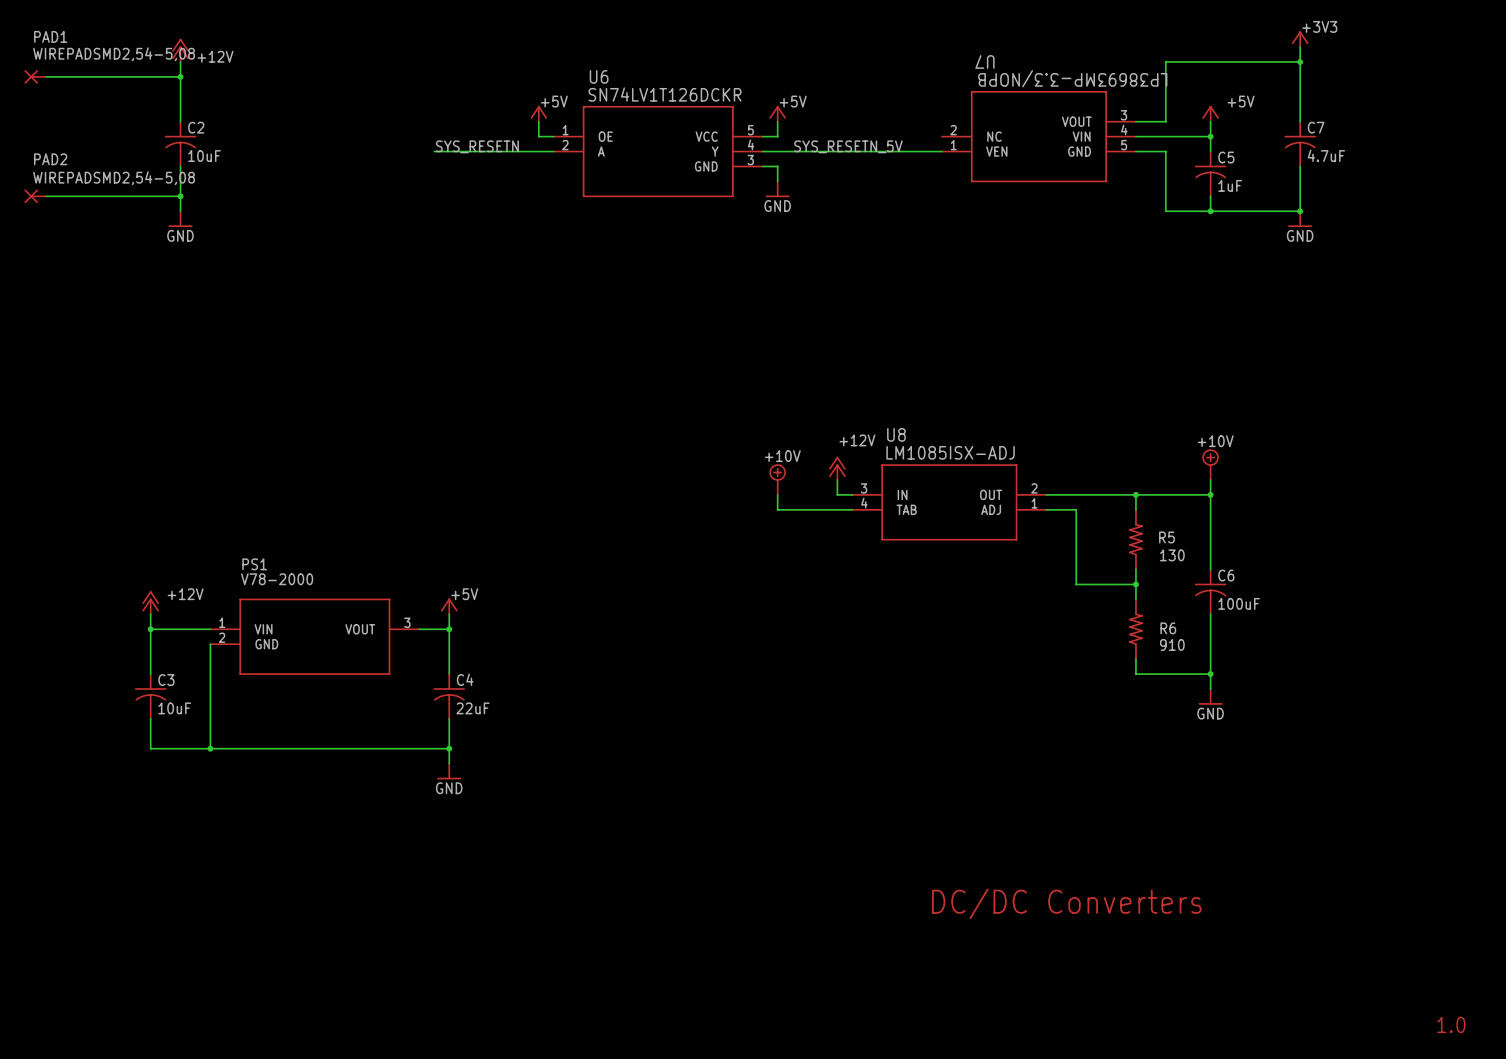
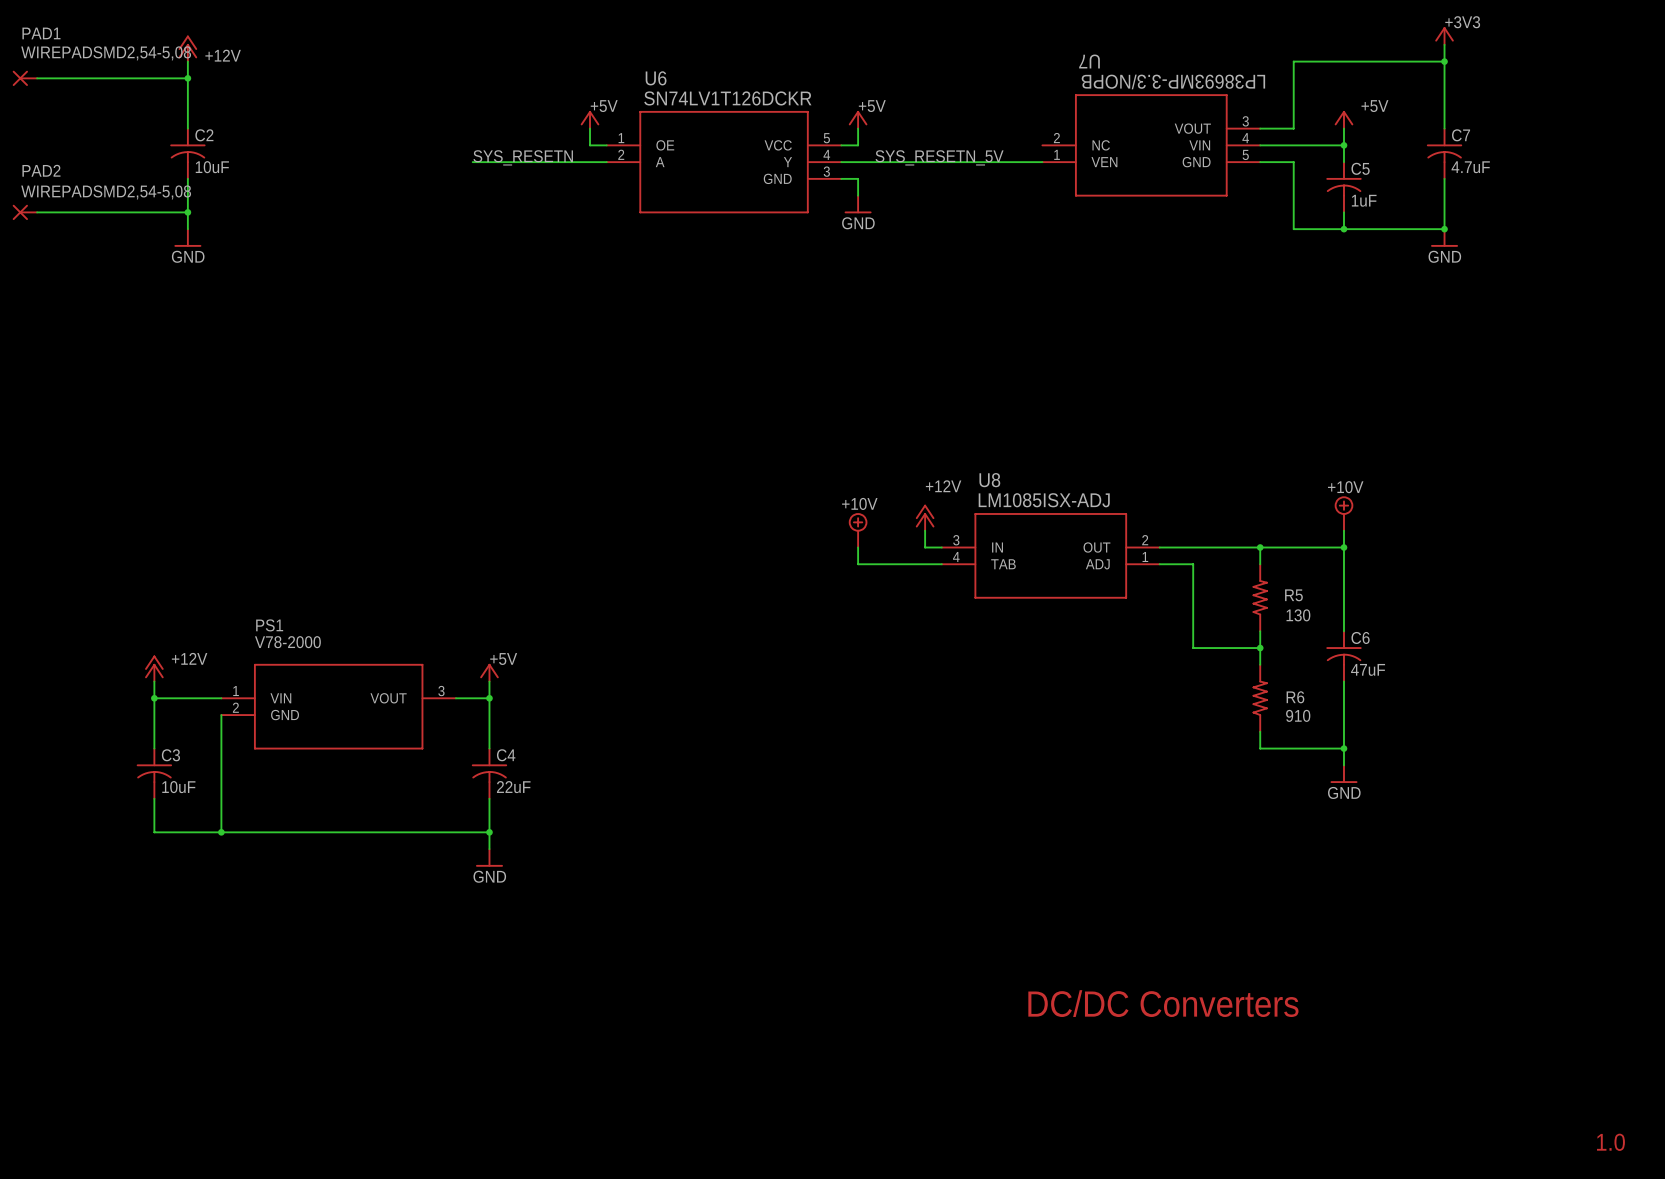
C6 value: 100uF (1239, 603) -> 47uF (1368, 669)

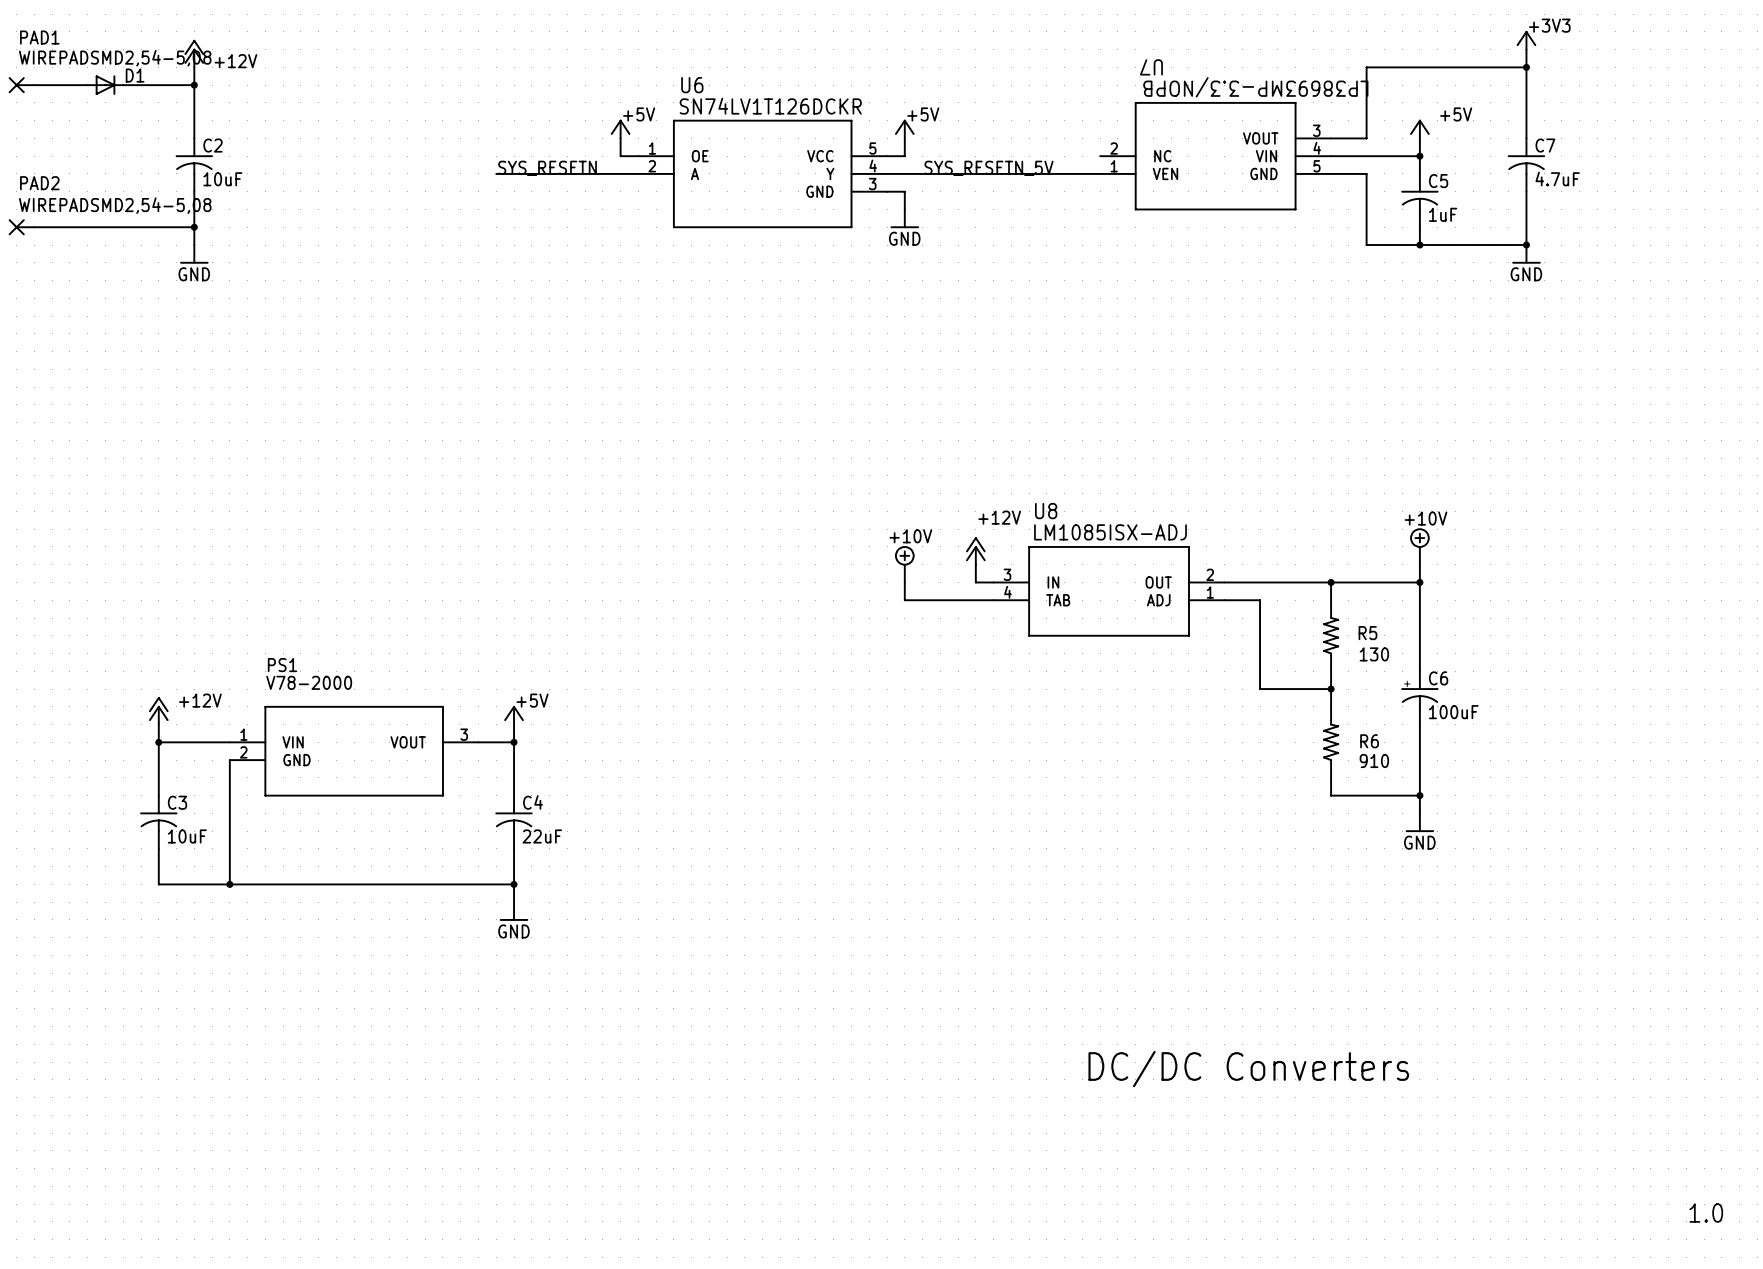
D1: none -> (105, 85)
C6 symbol: [1326, 631, 1362, 682] -> [1401, 671, 1439, 725]
C6 value: 47uF (1368, 669) -> 100uF (1453, 712)

